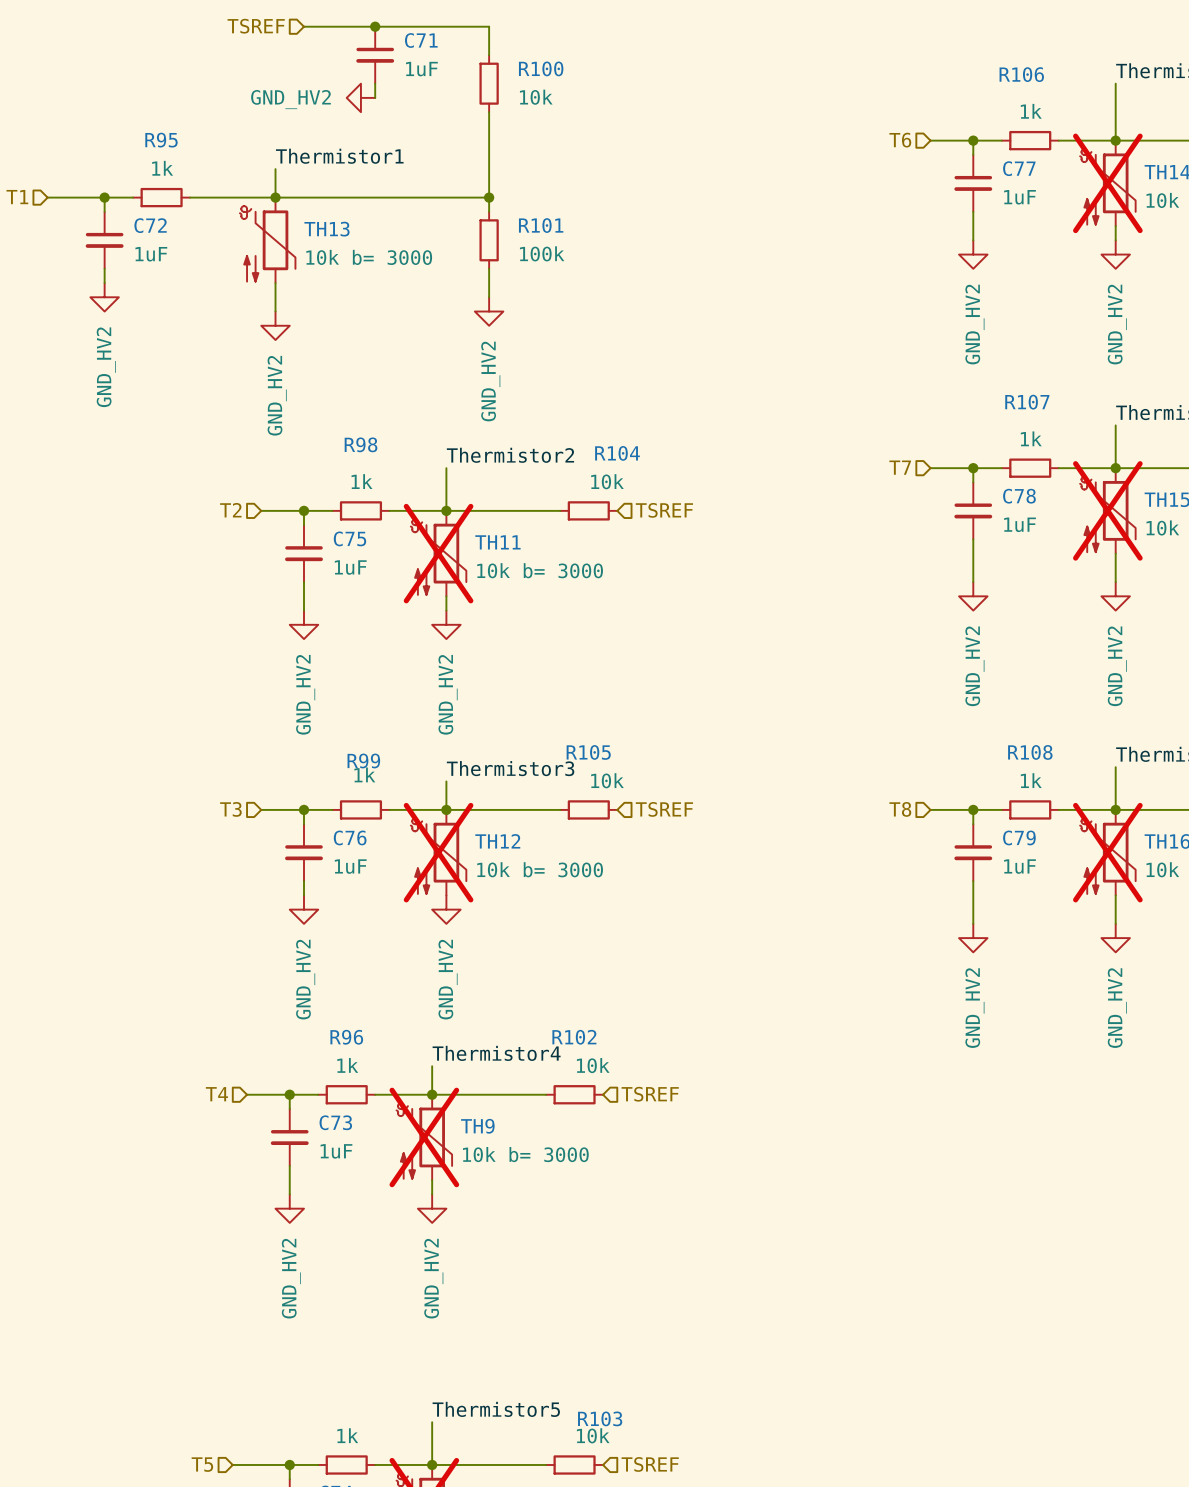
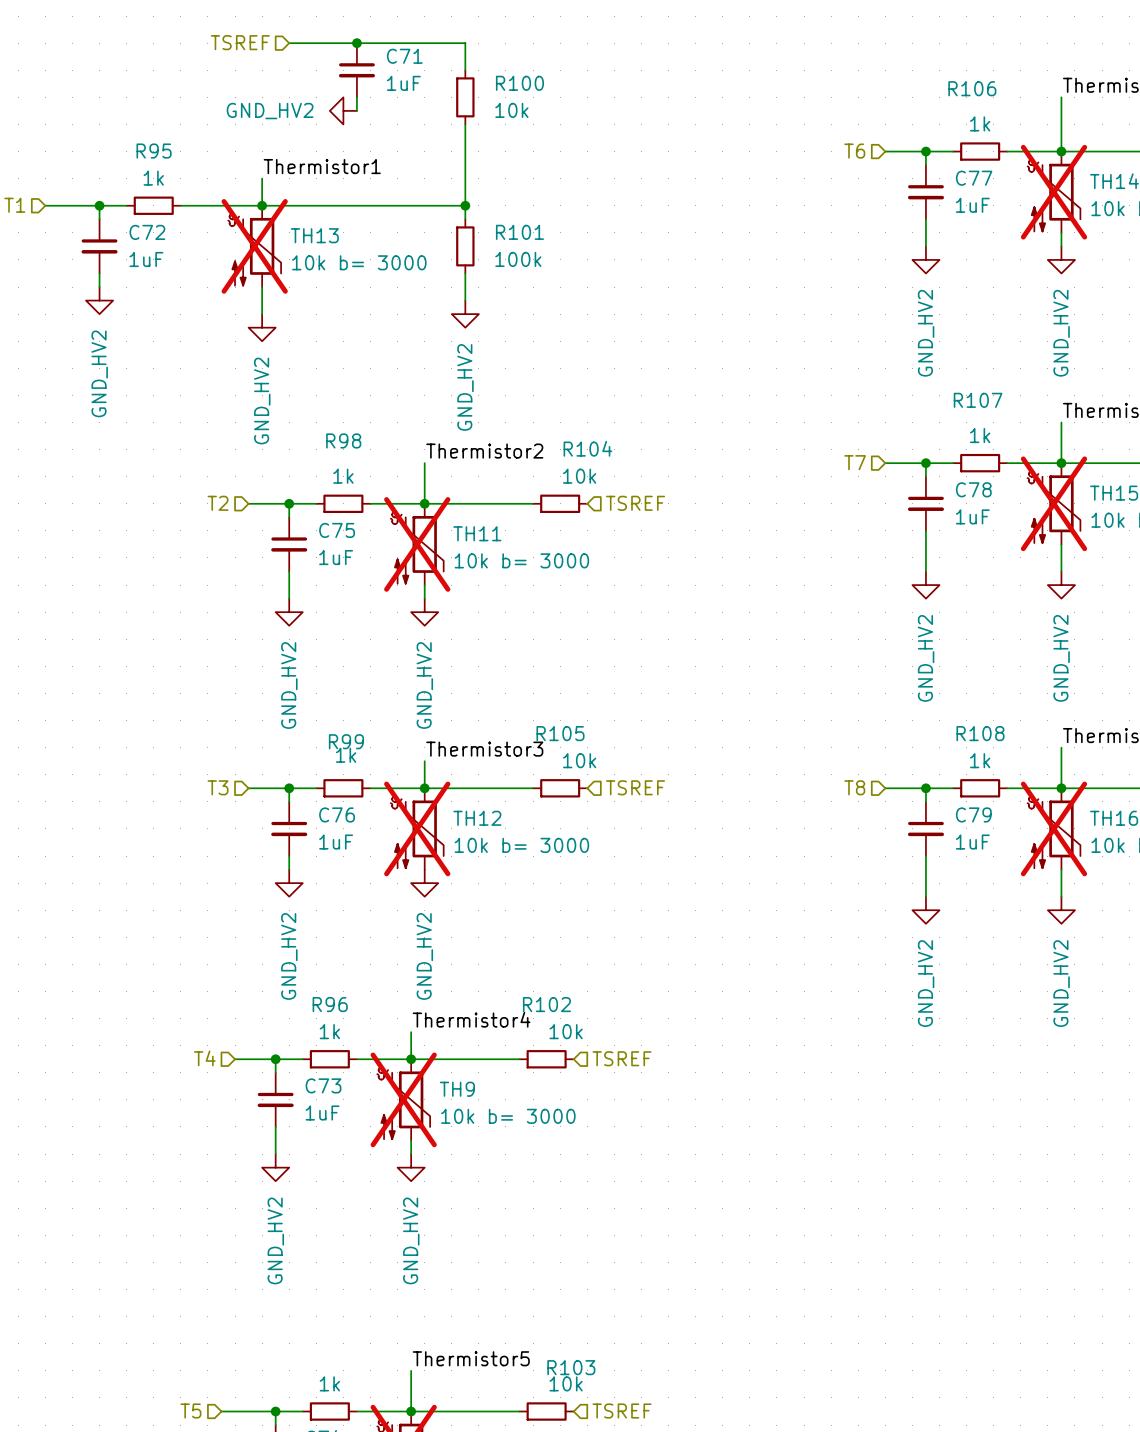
TH13 do-not-place cross: none -> (254, 246)

